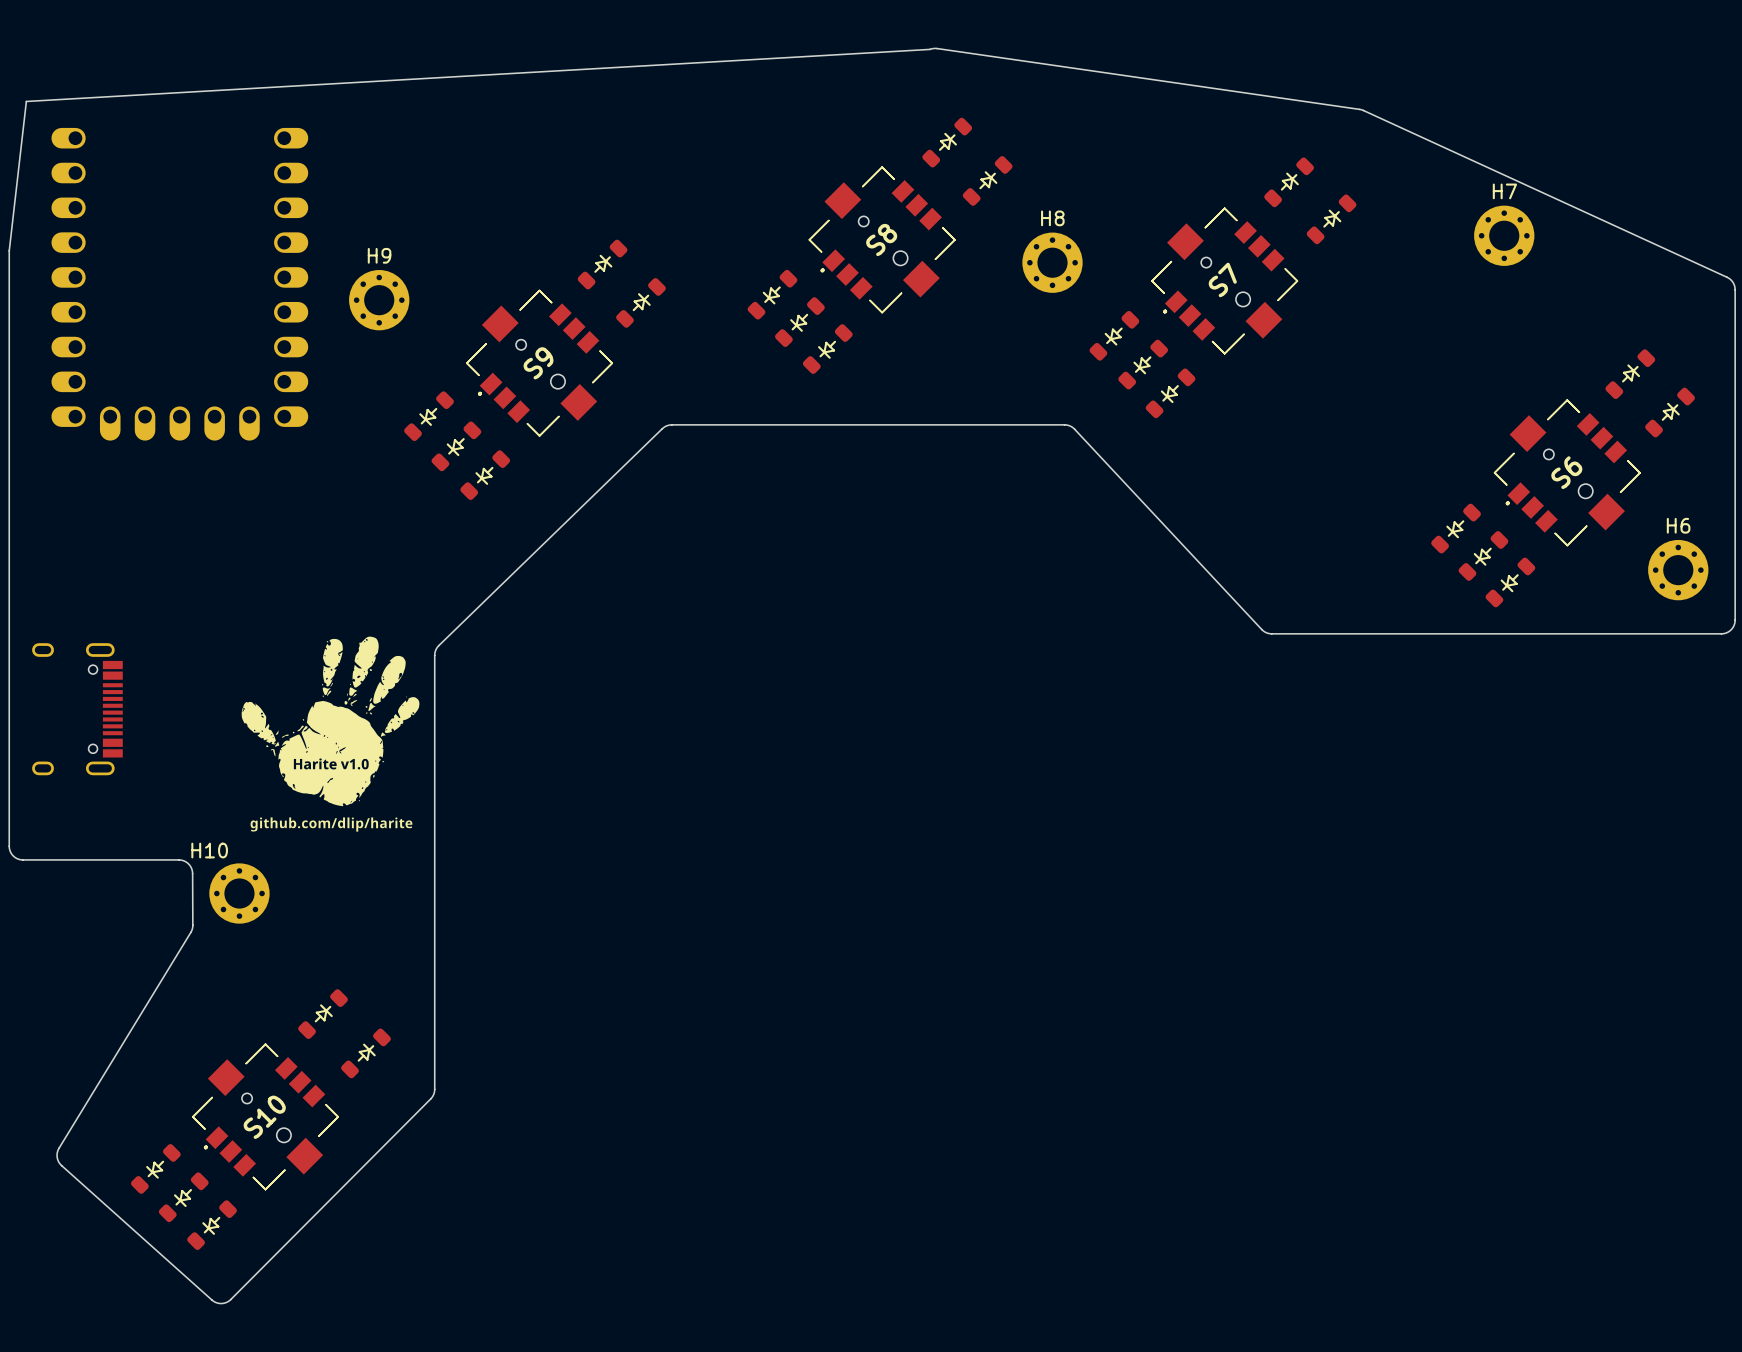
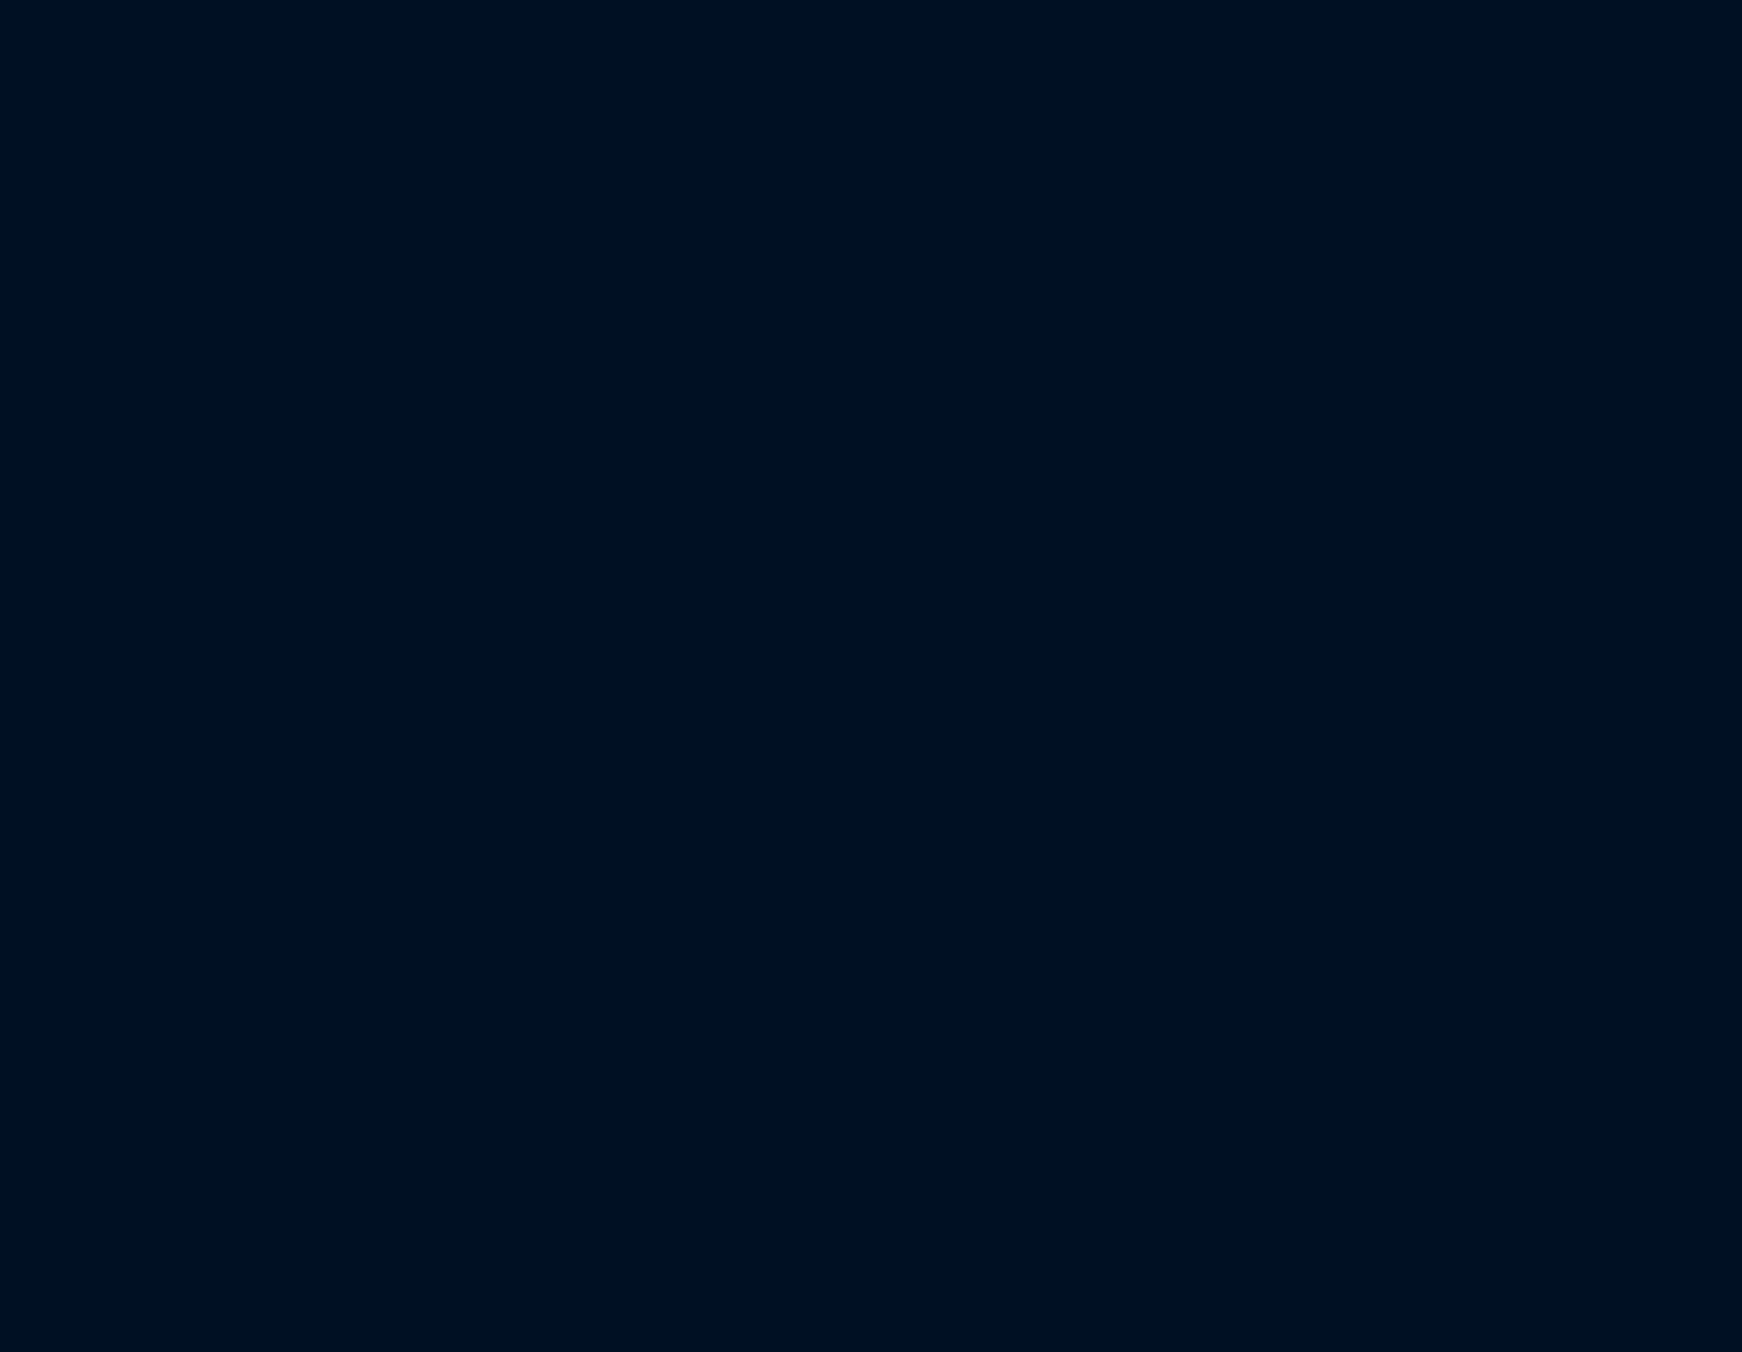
board edge: (937, 48) (1361, 109) (1729, 278) (1735, 289) (1735, 620) (1733, 627) (1728, 631) (1721, 633) (1268, 633) (1261, 629) (1074, 429) (1068, 425) (666, 425) (436, 648) (434, 655) (433, 1094) (230, 1299) (223, 1303) (214, 1302) (61, 1165) (57, 1157) (59, 1148) (191, 931) (192, 873) (188, 863) (180, 860) (21, 859) (13, 855) (9, 849) (9, 250) (26, 101) (937, 48) -> none
part: (947, 142) -> none
part: (987, 180) -> none
part: (1289, 182) -> none
part: (1331, 219) -> none
H7: (1504, 235) -> none
S8: (882, 239) -> none
H8: (1052, 262) -> none
part: (602, 264) -> none
S7: (1224, 280) -> none
part: (179, 284) -> none
part: (772, 294) -> none
H9: (379, 300) -> none
part: (640, 302) -> none
part: (799, 322) -> none
part: (1114, 335) -> none
part: (827, 349) -> none
S9: (539, 363) -> none
part: (1143, 364) -> none
part: (1630, 374) -> none
part: (1170, 393) -> none
part: (1670, 412) -> none
part: (429, 416) -> none
part: (456, 446) -> none
S6: (1567, 472) -> none
part: (485, 475) -> none
part: (1456, 528) -> none
part: (1483, 555) -> none
H6: (1678, 570) -> none
part: (1510, 582) -> none
drawing: [241, 636, 420, 832] -> none
part: (77, 709) -> none
H10: (239, 893) -> none
part: (323, 1014) -> none
part: (365, 1053) -> none
S10: (265, 1116) -> none
part: (155, 1168) -> none
part: (183, 1197) -> none
part: (212, 1225) -> none

